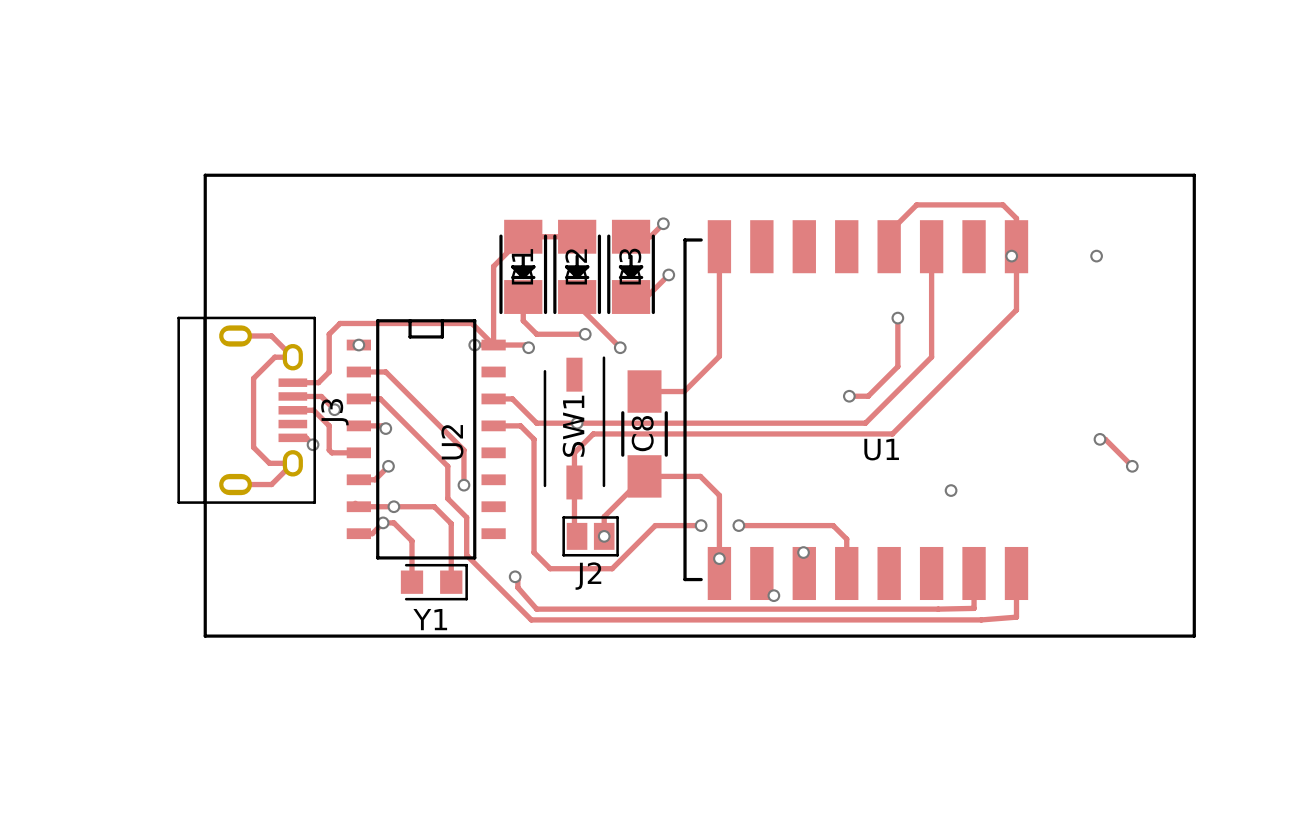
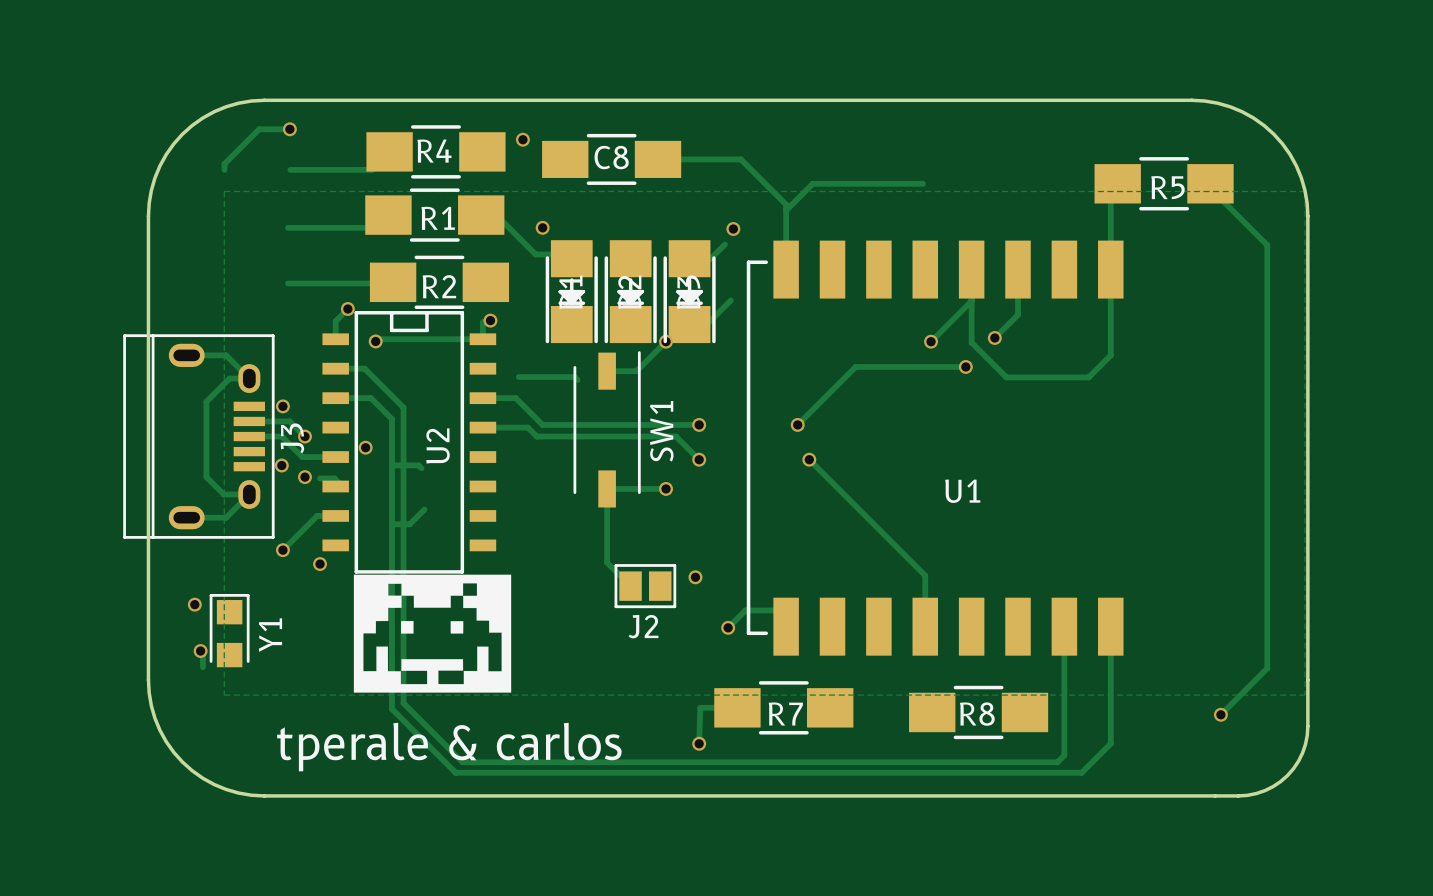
track: none -> (289, 129) (259, 129) (224, 163) (224, 169)
via: none -> (289, 129)
via: none -> (522, 139)
track: none -> (389, 151) (371, 169) (290, 169)
R4: none -> (435, 151)
track: none -> (658, 158) (740, 159) (786, 204) (786, 251)
track: none -> (922, 183) (812, 183) (786, 210)
track: none -> (1117, 183) (1110, 190) (1110, 238)
R5: none -> (1164, 183)
track: none -> (1210, 183) (1210, 188) (1267, 245) (1267, 668) (1220, 714)
board edge: (205, 175) (1194, 175) (1194, 636) (205, 636) (205, 175) -> (264, 100) (226, 106) (202, 118) (182, 134) (159, 165) (149, 203) (149, 692) (154, 718) (166, 741) (182, 761) (202, 778) (238, 793) (264, 795) (1238, 795) (1256, 793) (1273, 786) (1287, 775) (1298, 761) (1305, 744) (1307, 726) (1307, 203) (1301, 177) (1290, 154) (1273, 134) (1253, 118) (1217, 103) (1191, 100) (264, 100)
track: none -> (388, 215) (375, 227) (288, 227)
R1: none -> (434, 215)
track: none -> (481, 215) (496, 215) (535, 254) (579, 254)
via: none -> (542, 227)
track: (1016, 218) (1002, 204) (916, 204) (889, 232) (889, 261) -> (1110, 338) (1110, 355) (1088, 377) (1006, 377) (971, 342) (971, 285)
via position: (663, 223) -> (733, 229)
track: (577, 236) (523, 236) (493, 266) (493, 345) (472, 323) (339, 323) (329, 334) (329, 371) (318, 382) (292, 382) -> none
via: (1011, 256) -> none
via: (1096, 256) -> none
track: none -> (393, 282) (288, 283)
R2: none -> (439, 282)
track: (719, 261) (719, 356) (684, 391) (644, 391) -> none
via: (668, 274) -> none
track: none -> (971, 301) (931, 341)
track: none -> (347, 309) (335, 321) (335, 339)
via: none -> (347, 309)
track: (931, 288) (931, 357) (865, 423) (536, 423) (512, 398) (493, 398) -> (1018, 314) (994, 337)
track: none -> (490, 320) (482, 322) (482, 339) (377, 339) (375, 341)
via: none -> (490, 320)
track: (523, 297) (523, 320) (536, 334) (585, 334) -> none
track: (577, 304) (620, 347) -> none
track: (1016, 309) (892, 433) (593, 433) (574, 452) (574, 533) (577, 536) -> none
track: none -> (666, 341) (636, 371) (607, 371)
via: none -> (666, 341)
via: none -> (931, 341)
track: (897, 318) (897, 366) (868, 396) (849, 396) -> none
via position: (897, 318) -> (994, 337)
via: (585, 334) -> none
track: (235, 335) (271, 335) (292, 357) (274, 357) (253, 378) (253, 447) (269, 463) (292, 463) (271, 484) (235, 484) -> (186, 355) (226, 355) (249, 378) (229, 378) (206, 401) (206, 477) (223, 494) (249, 494) (226, 517) (186, 517)
track: none -> (965, 366) (855, 366) (797, 424)
via: none -> (965, 366)
via position: (358, 345) -> (375, 341)
via: (474, 345) -> none
via: (528, 347) -> none
via: (620, 347) -> none
track: none -> (482, 398) (515, 398) (542, 424) (699, 424)
via: none -> (282, 406)
track: (358, 371) (385, 371) (463, 450) (463, 485) -> none
track: none -> (254, 421) (289, 421) (304, 436)
via: none -> (699, 424)
via: none -> (797, 424)
track: none -> (482, 427) (527, 427) (536, 436) (675, 436) (699, 459)
track: (292, 396) (321, 396) (334, 409) -> none
via: (849, 396) -> none
track: (358, 398) (380, 398) (447, 466) (447, 498) (466, 517) (466, 555) (531, 619) (981, 619) (1016, 617) -> (335, 398) (370, 398) (391, 419) (391, 708) (455, 772) (1081, 772) (1110, 743) (1110, 674)
track: none -> (254, 436) (281, 436) (302, 457) (335, 457)
via: none -> (304, 436)
J3 position: (246, 410) -> (198, 436)
track: (292, 410) (313, 410) (329, 425) (329, 450) (331, 452) (358, 452) -> none
via: none -> (699, 459)
via: none -> (809, 459)
via: (577, 423) -> none
track: (493, 425) (520, 425) (534, 439) (534, 552) (550, 568) (612, 568) (655, 525) (701, 525) -> none
via: none -> (281, 465)
SW1 name position: SW1 (573, 426) -> SW1 (661, 431)
SW1 position: (574, 427) -> (607, 429)
via: (385, 428) -> none
C8 rotation: 0° (644, 433) -> 90° clockwise (611, 159)
C8 position: (644, 433) -> (611, 159)
via: none -> (304, 477)
U2 position: (426, 439) -> (409, 442)
track: (1099, 439) (1105, 439) (1132, 466) -> none
via: (1099, 439) -> none
via: (313, 444) -> none
track: none -> (666, 488) (607, 488) (607, 562) (621, 577)
via: none -> (666, 488)
via: (388, 466) -> none
via: (1132, 466) -> none
track: none -> (337, 517) (335, 515) (317, 515) (282, 550)
via: (463, 485) -> none
via: (951, 490) -> none
via: none -> (282, 550)
track: (355, 503) (358, 506) (434, 506) (451, 523) (451, 582) -> none
via: (393, 506) -> none
via: none -> (320, 564)
via: (383, 522) -> none
drawing: none -> [353, 574, 512, 693]
via: (701, 525) -> none
track: (738, 525) (833, 525) (846, 539) -> (809, 459) (925, 575) (925, 589)
via: (738, 525) -> none
via: none -> (695, 577)
track: (358, 533) (372, 533) (383, 522) (393, 522) (411, 541) (411, 582) -> none
track: (604, 536) (604, 516) (644, 476) (700, 476) (719, 495) (719, 558) -> (728, 627) (745, 610) (786, 610)
via: (604, 536) -> none
via: (803, 552) -> none
via: none -> (194, 604)
via: (719, 558) -> none
via: none -> (728, 627)
track: (515, 576) (517, 579) (517, 587) (536, 609) (974, 608) -> (335, 368) (364, 368) (403, 407) (403, 703) (462, 762) (1057, 762) (1064, 755) (1064, 664)
via: (515, 576) -> none
Y1 rotation: 0° (434, 582) -> 90° counterclockwise (229, 630)
Y1 position: (434, 582) -> (229, 630)
track: none -> (200, 651) (202, 653) (202, 667)
via: none -> (200, 651)
via: (773, 595) -> none
track: none -> (737, 707) (700, 707) (699, 743)
R7: none -> (783, 707)
R8: none -> (978, 712)
via: none -> (1220, 714)
via: none -> (699, 743)
text: none -> tperale & carlos (449, 747)

